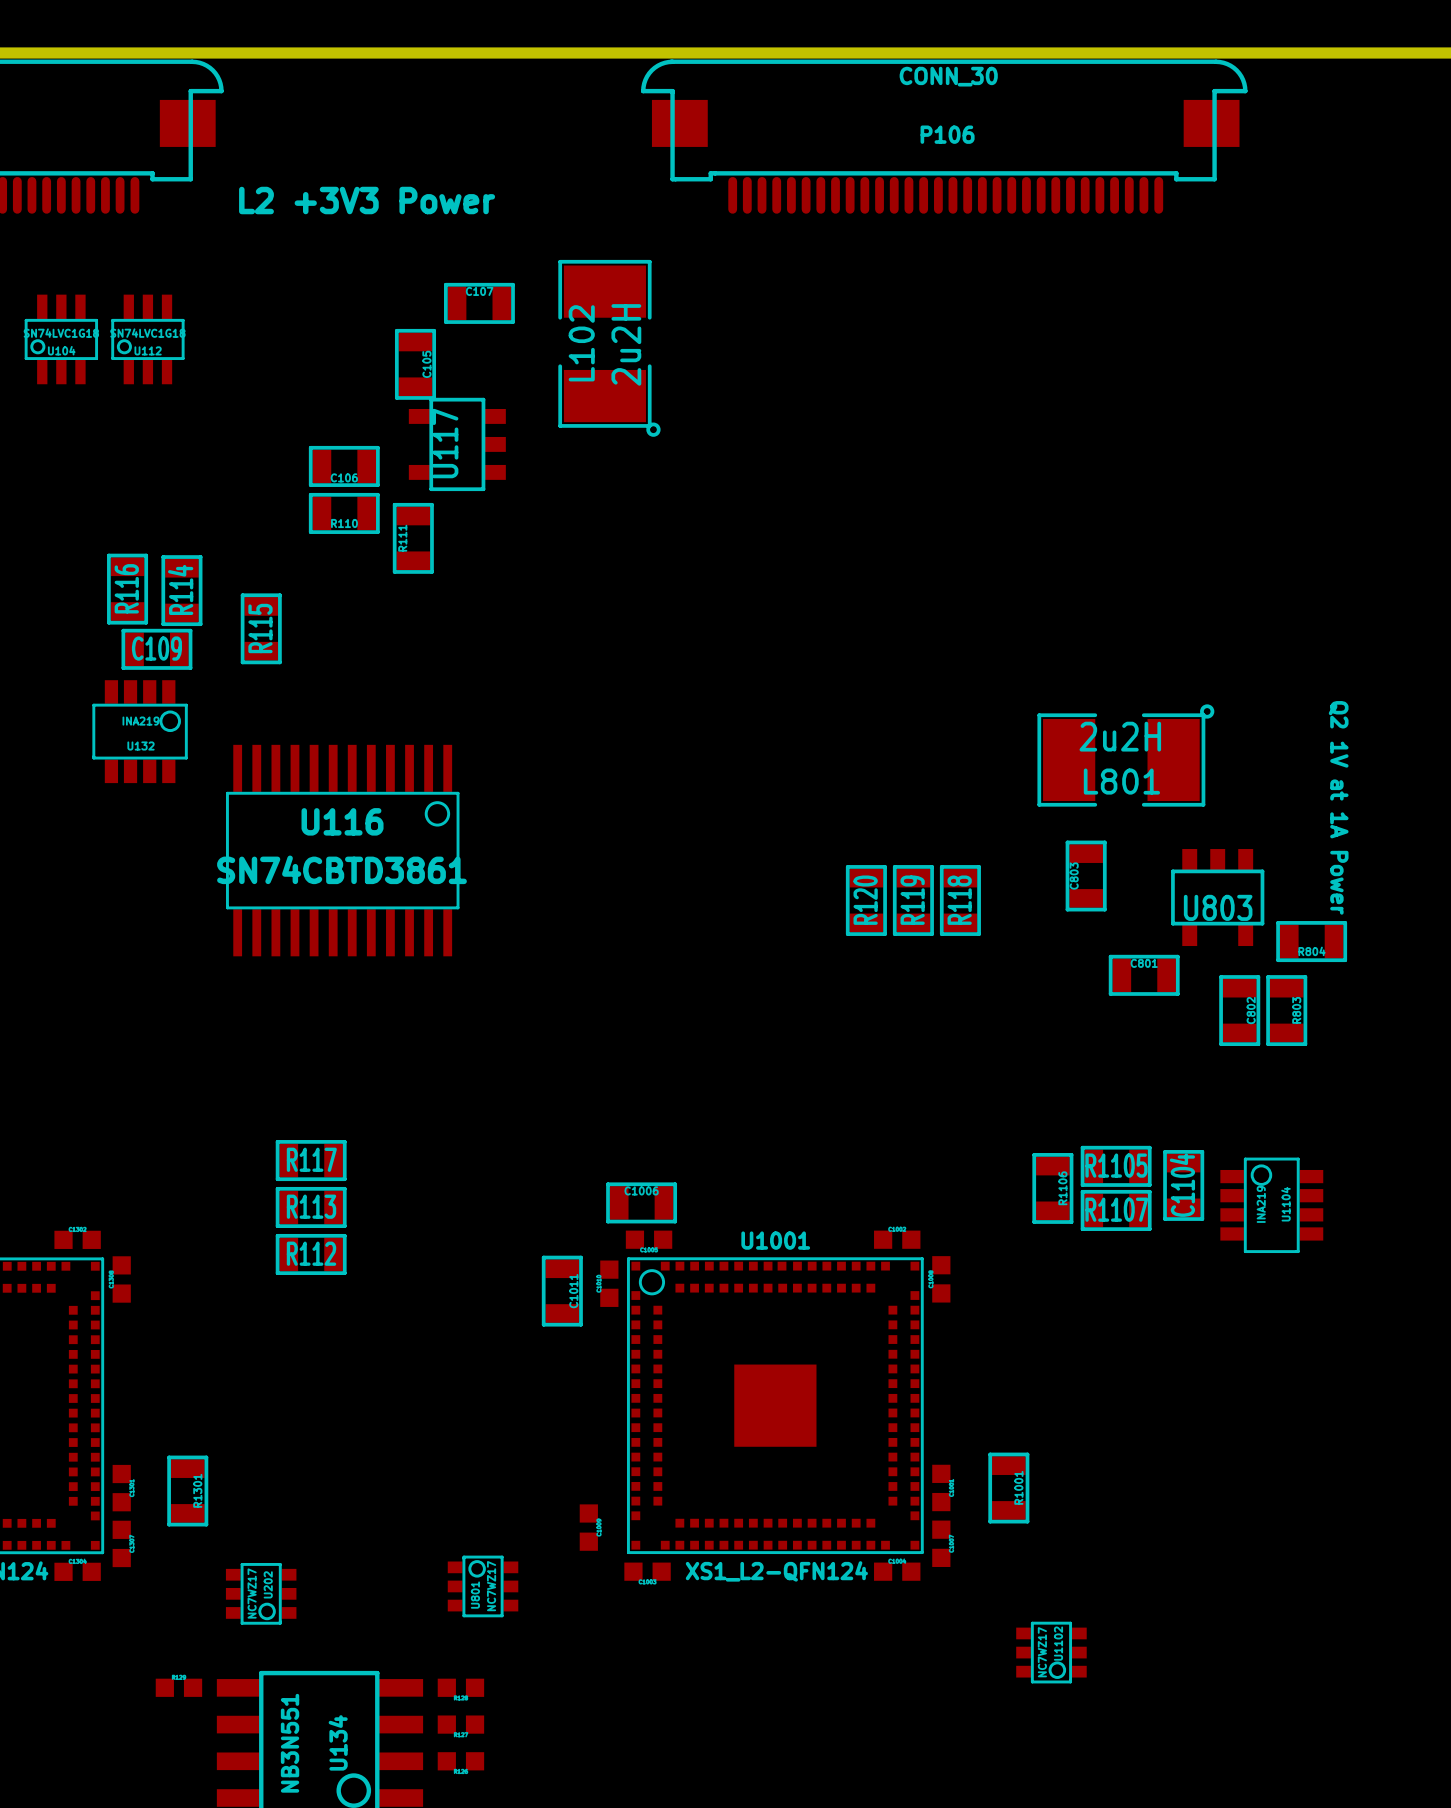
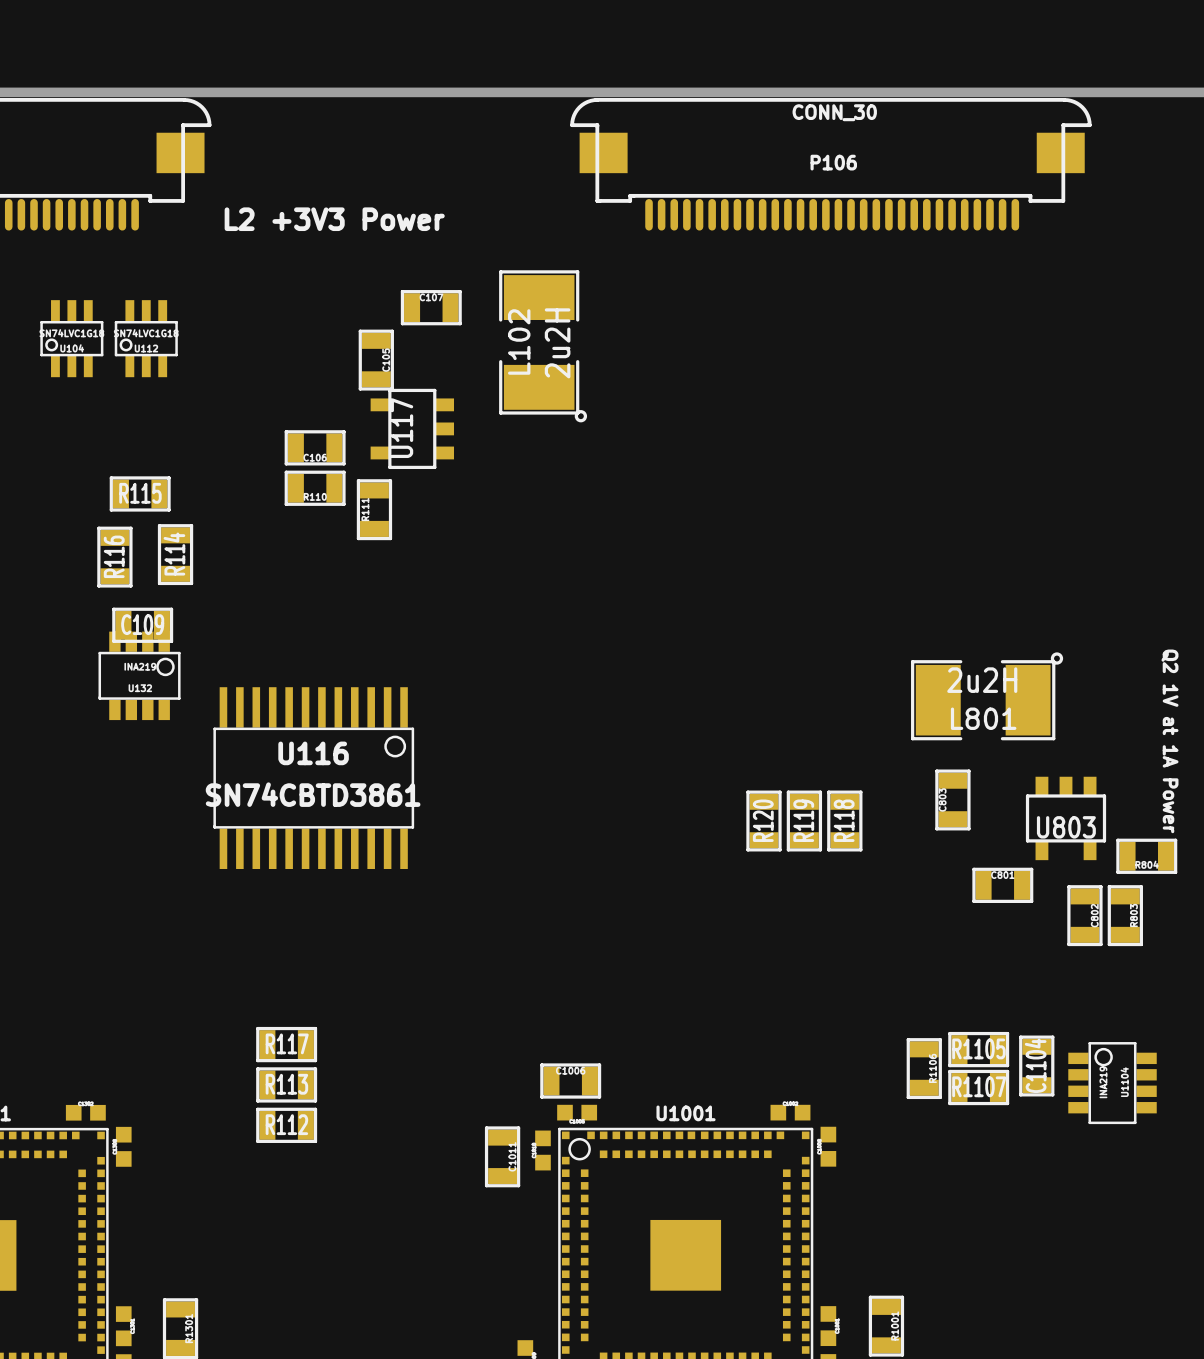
R116 position: (127, 589) -> (114, 557)
R115 rotation: 0° (261, 628) -> 90° clockwise (140, 493)
R115 position: (261, 628) -> (140, 493)
C109 position: (156, 649) -> (142, 625)

